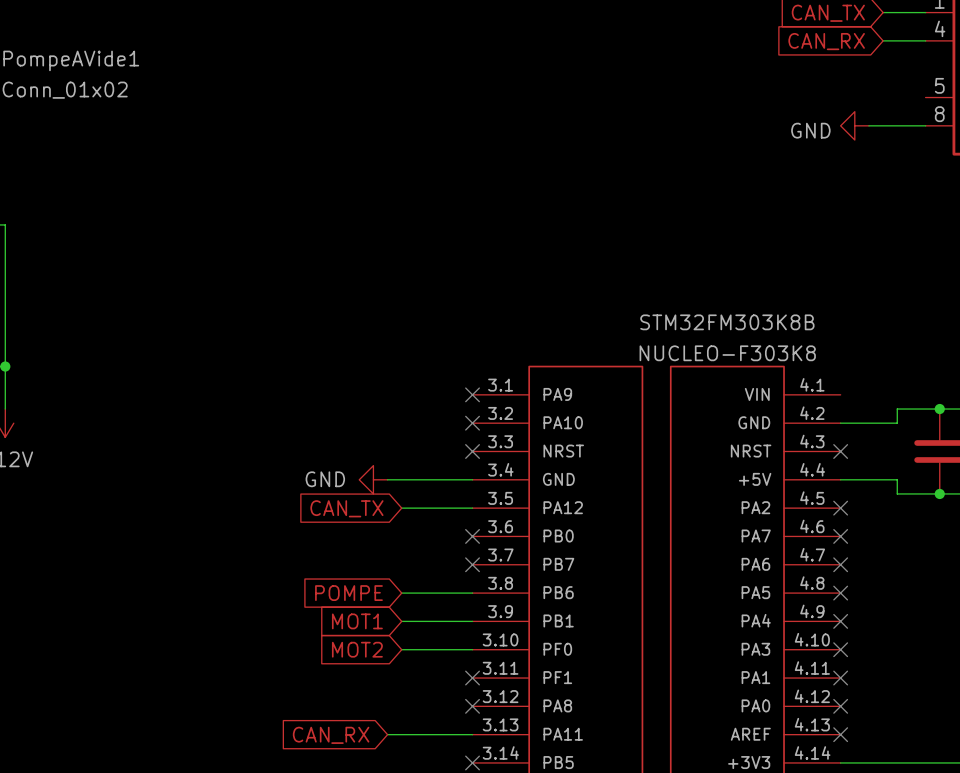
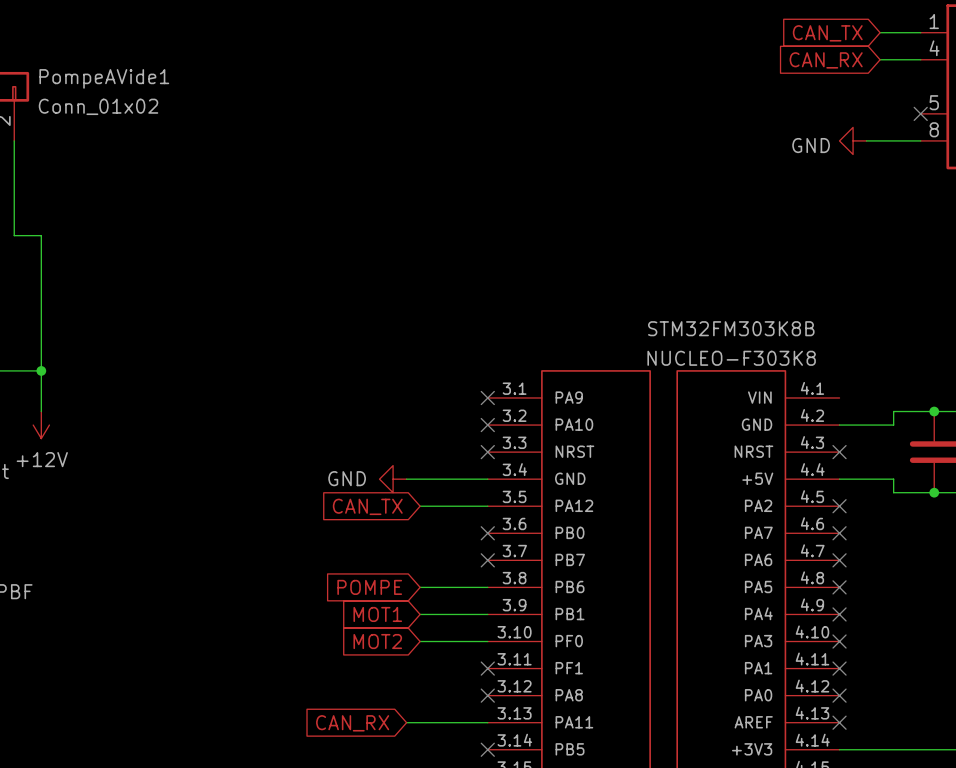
no-connect mark: none -> (920, 113)

